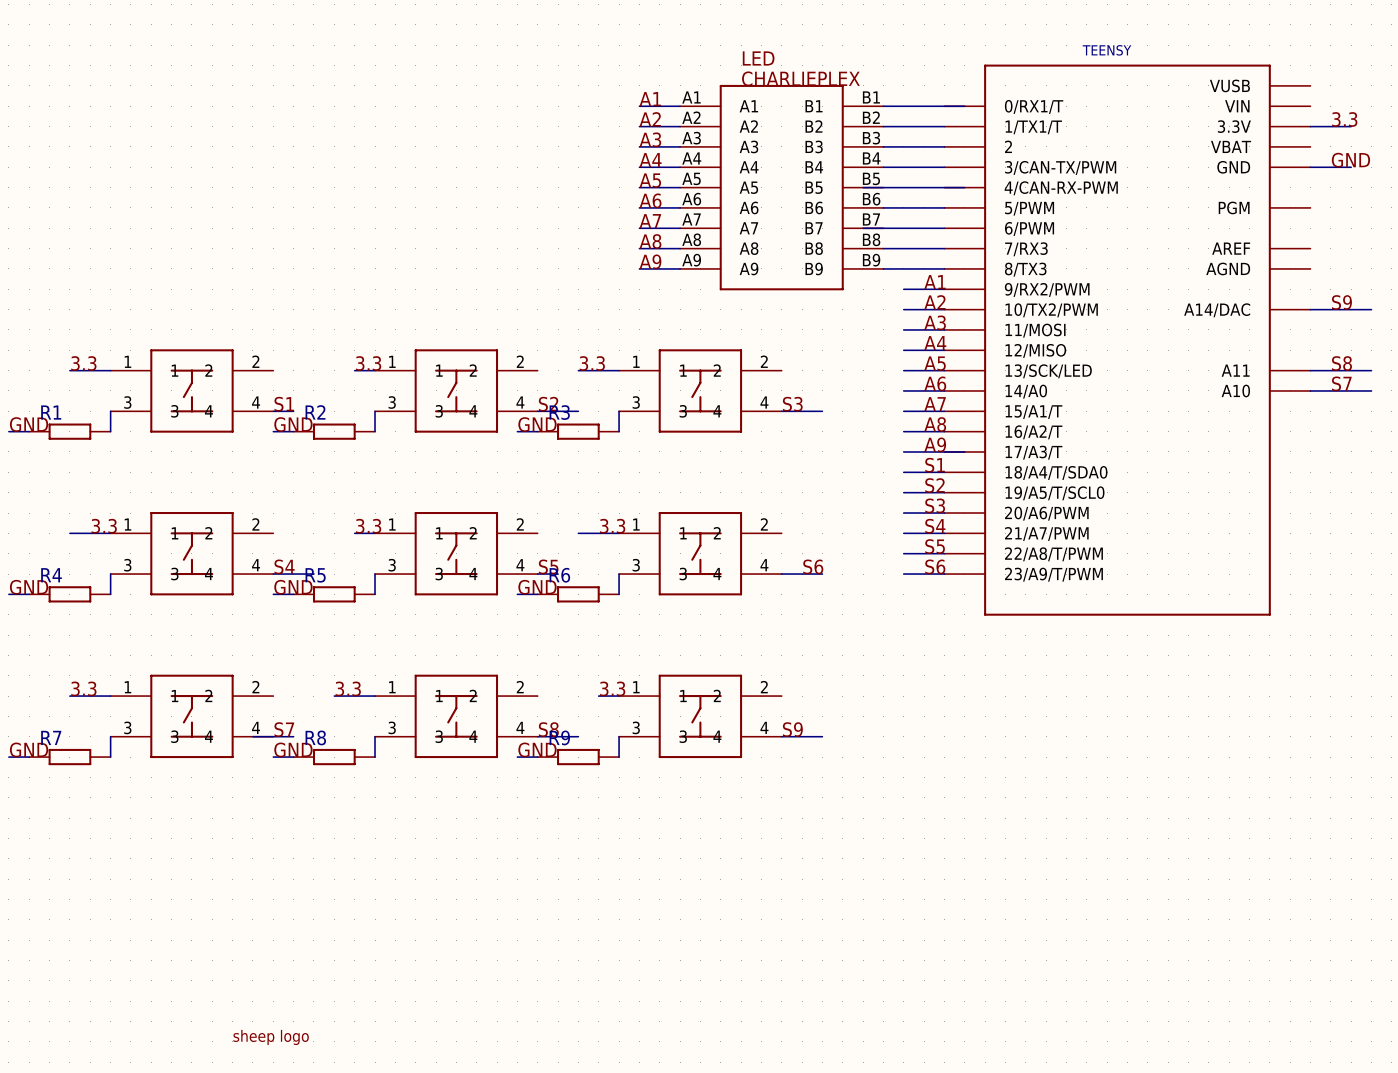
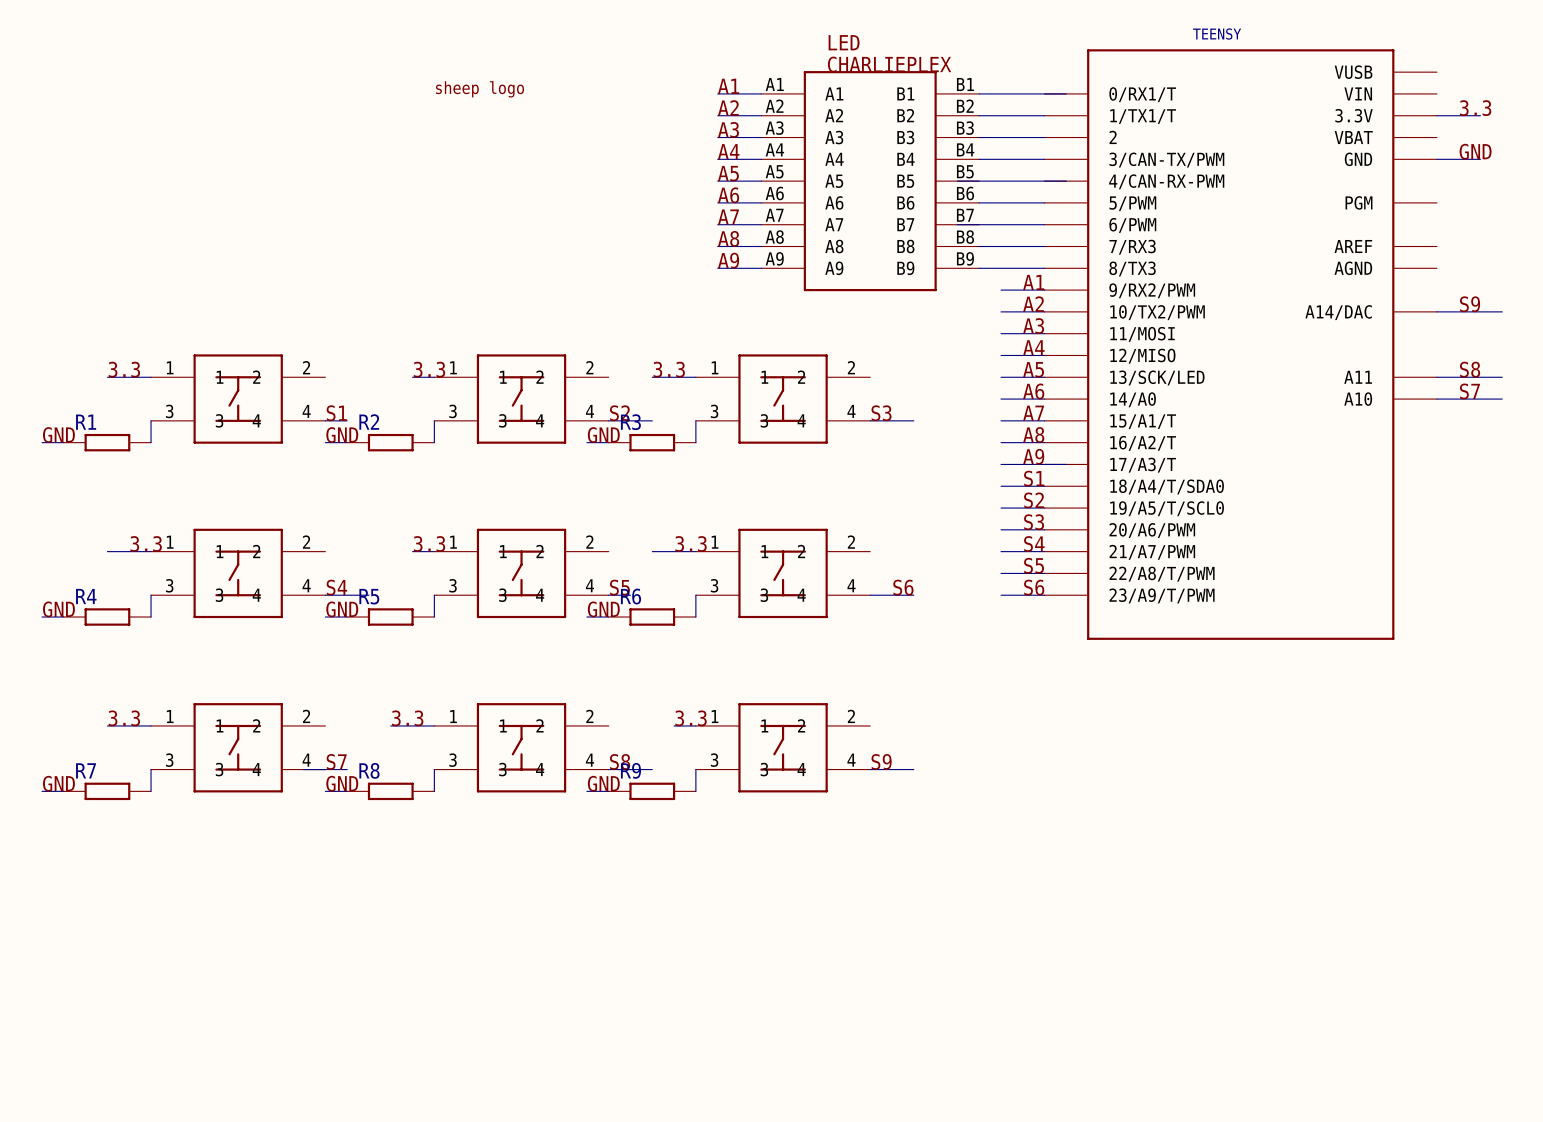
part: none -> (479, 89)
part: (271, 1037) -> none

